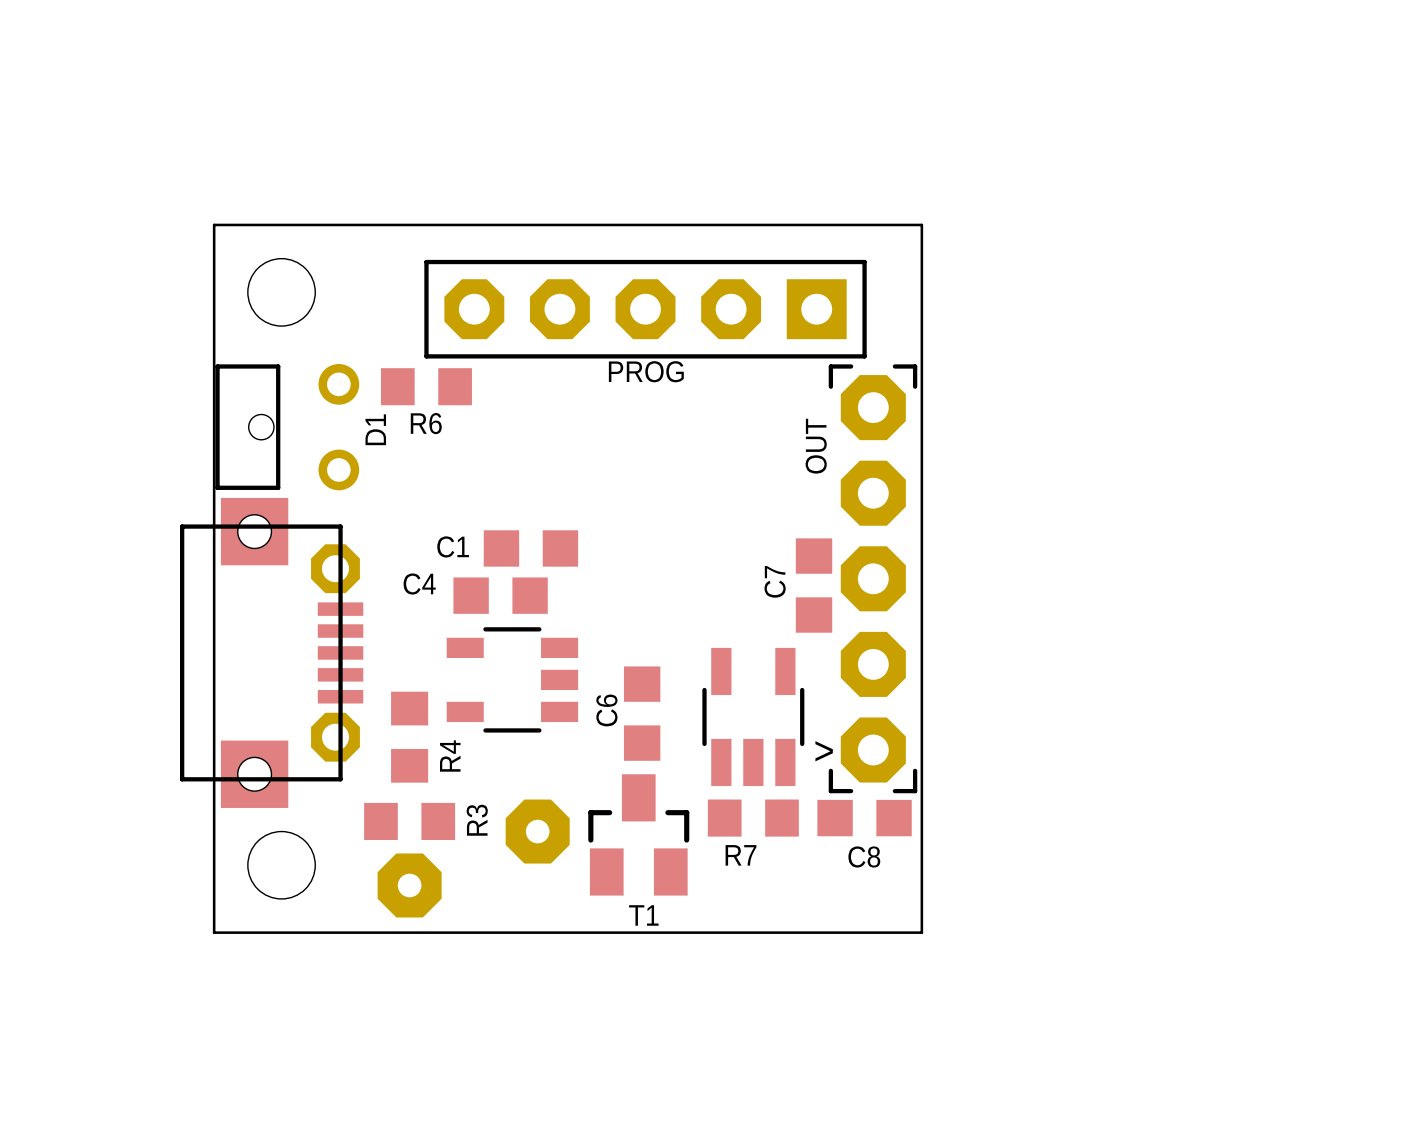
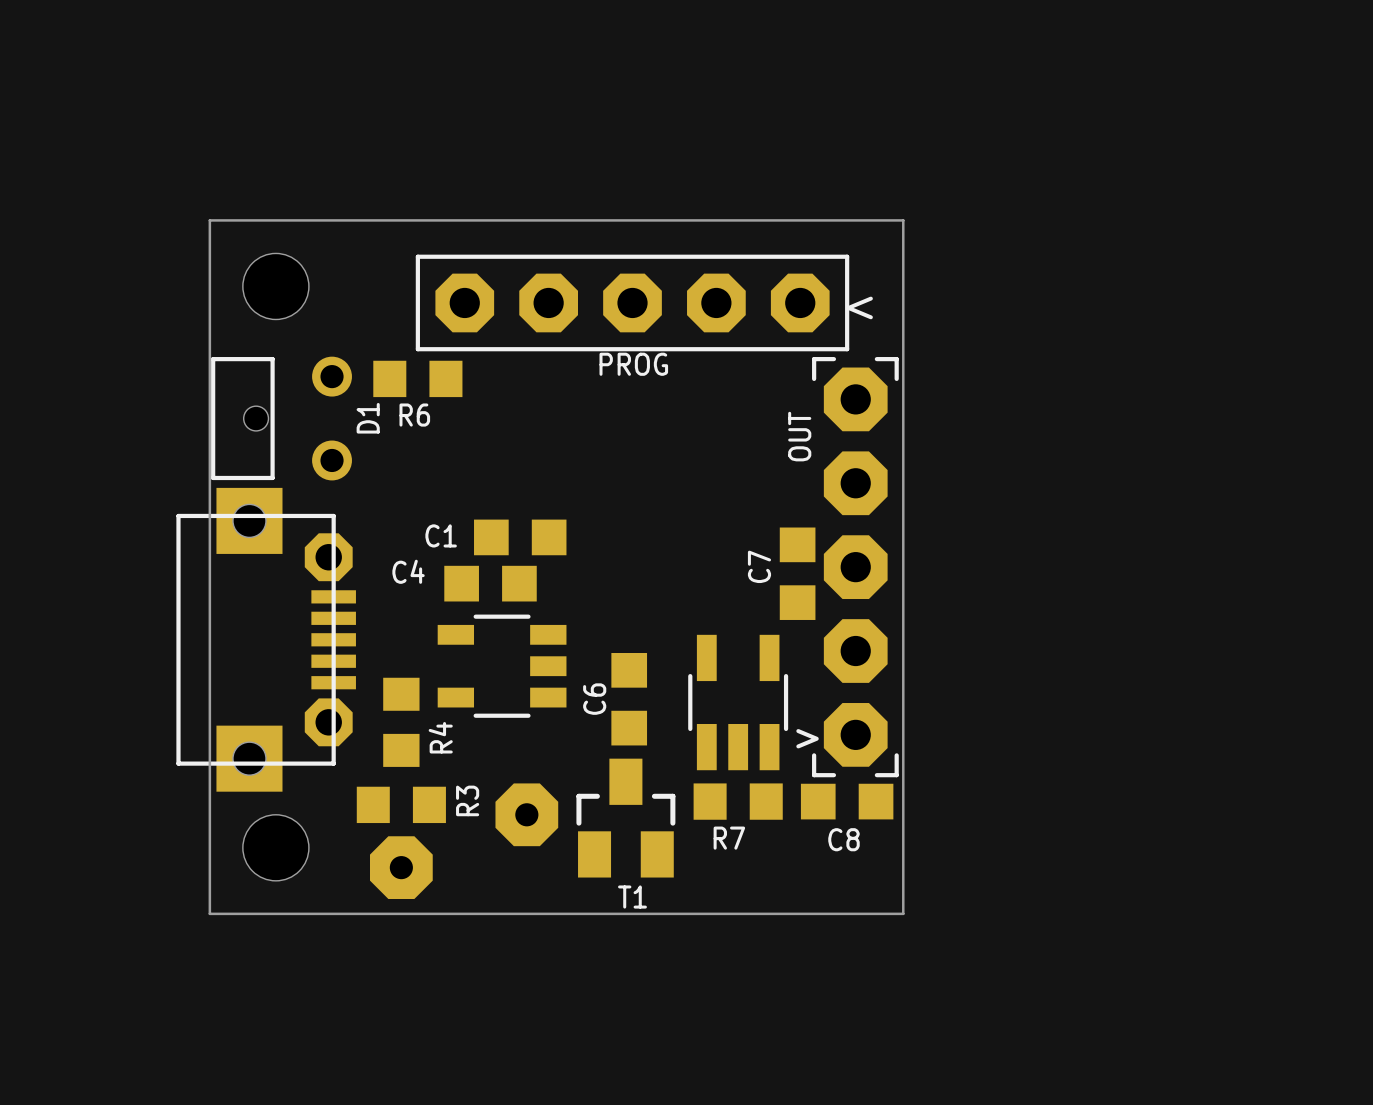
PROG footprint: [424, 259, 867, 359] -> [415, 254, 850, 352]

